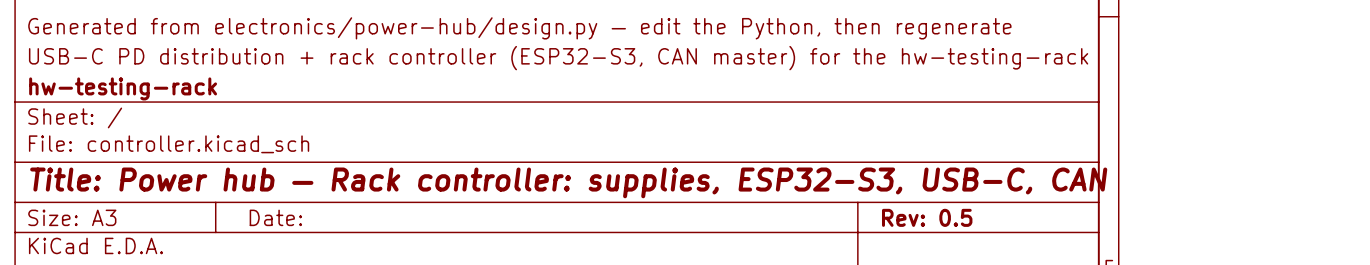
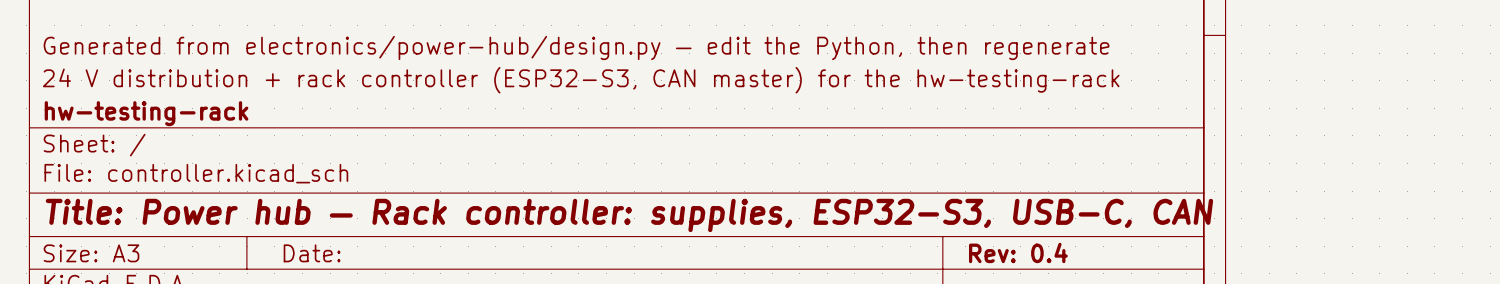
title block: USB-C PD distribution + rack controller (ESP32-S3, CAN master) for the hw-testing-rack (558, 58) -> 24 V distribution + rack controller (ESP32-S3, CAN master) for the hw-testing-rack (581, 80)
title block: Rev: 0.5 (927, 217) -> Rev: 0.4 (1018, 252)

